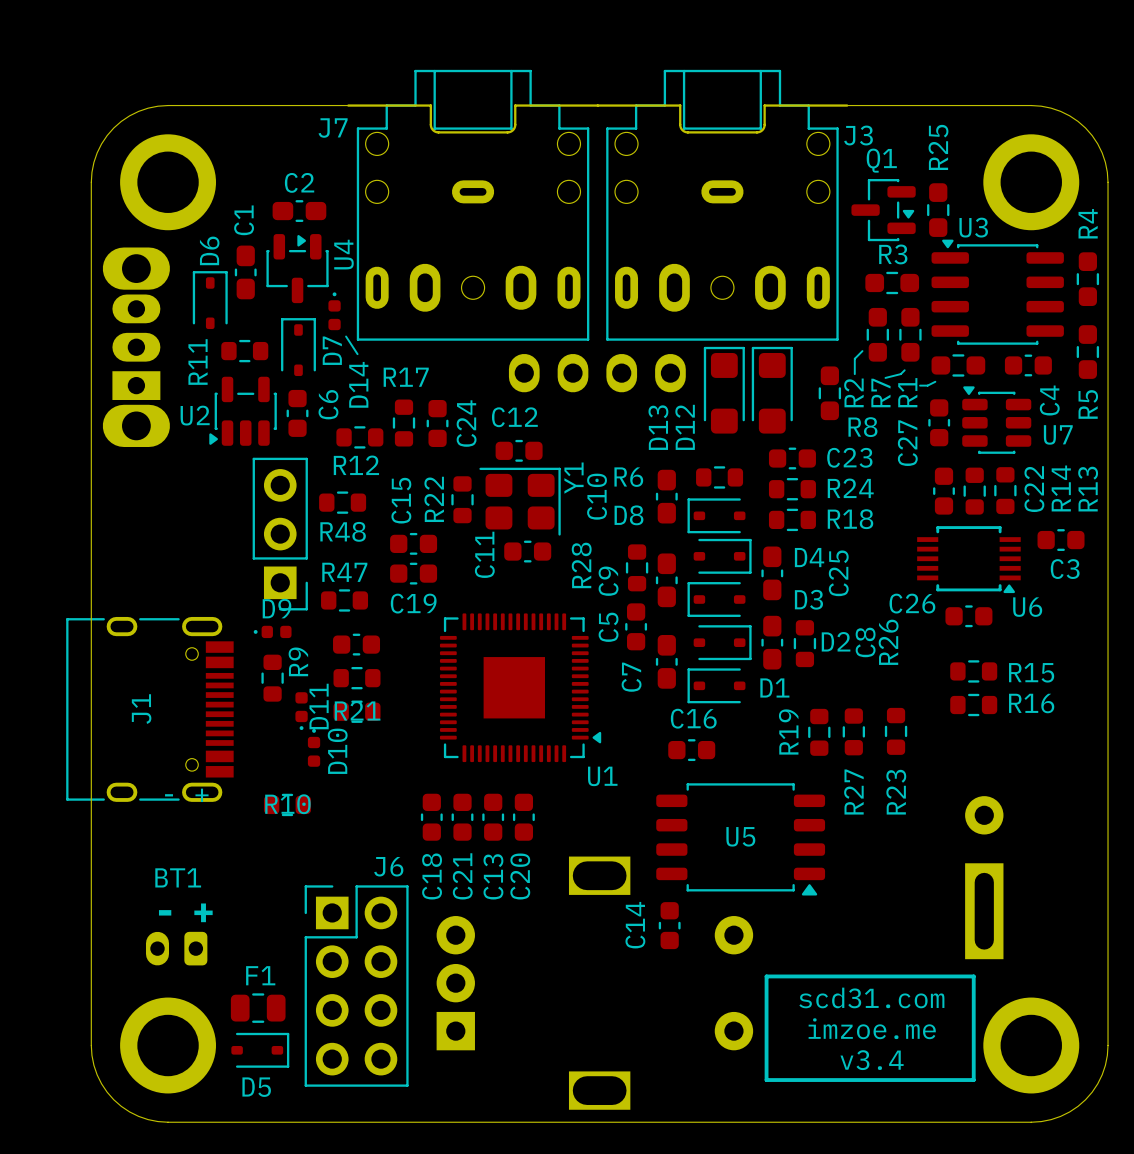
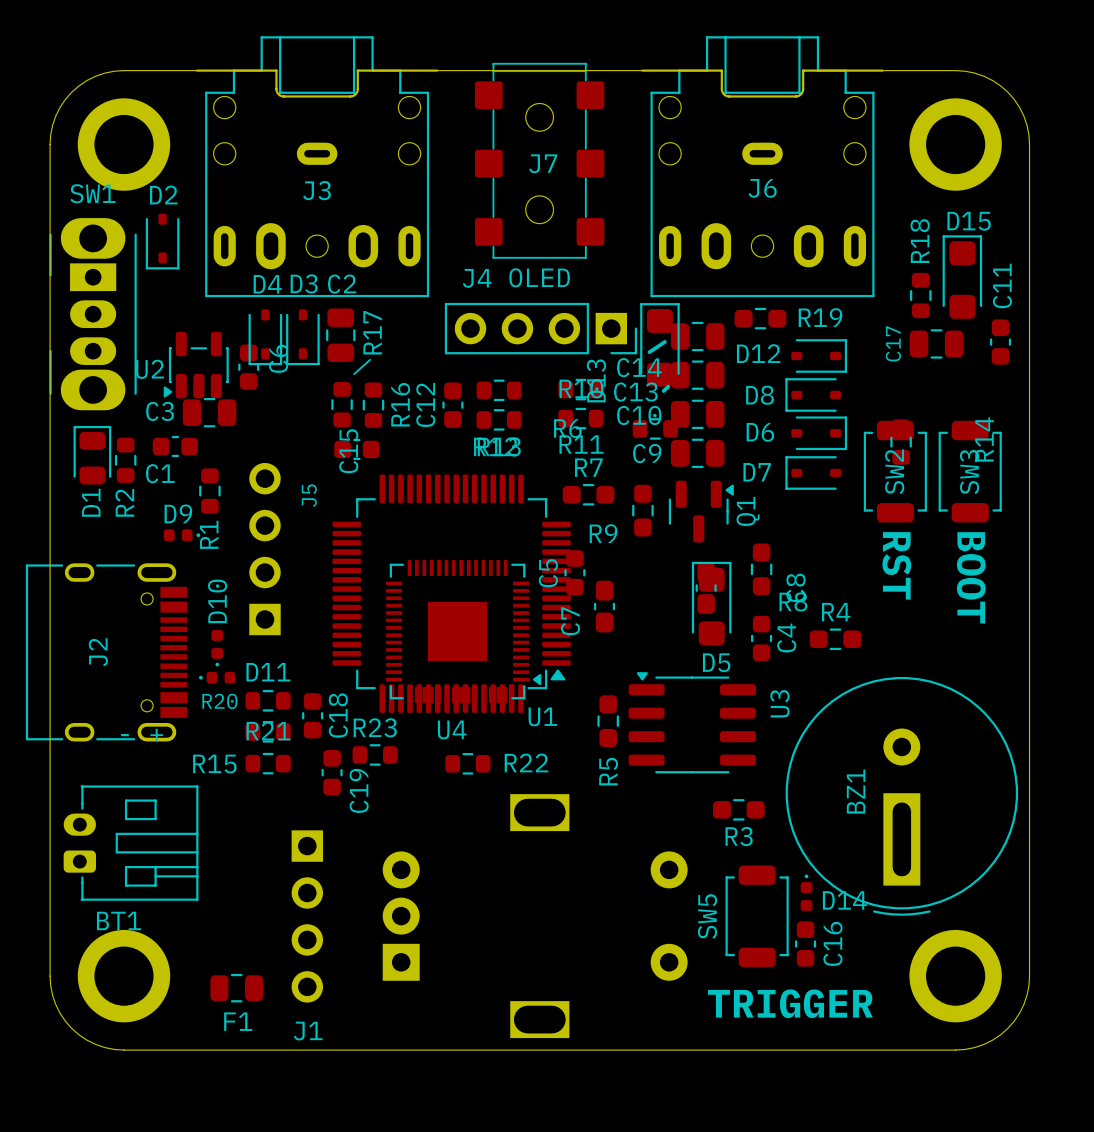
J7 footprint: [347, 69, 599, 341] -> [474, 62, 605, 259]
board edge: (243, 105) (348, 105) -> none
board edge: none -> (437, 70) (642, 70)
board edge: (847, 105) (955, 105) -> none
J7 name position: J7 (333, 128) -> J7 (543, 163)
J3 name position: J3 (858, 135) -> J3 (317, 190)
Q1 name position: Q1 (881, 160) -> Q1 (748, 511)
Q1 footprint: [851, 179, 916, 242] -> [668, 480, 734, 543]
C2 footprint: [272, 200, 327, 222] -> [326, 308, 356, 363]
J3 position: (722, 205) -> (317, 166)
R25: (938, 210) -> none
C1 name position: C1 (244, 220) -> C1 (160, 473)
U3 name position: U3 (973, 227) -> U3 (779, 703)
U4 footprint: [266, 234, 329, 304] -> [332, 474, 571, 713]
U3 footprint: [931, 239, 1064, 345] -> [628, 672, 757, 774]
C1 footprint: [234, 245, 257, 300] -> [152, 435, 199, 458]
D6 name position: D6 (209, 250) -> D6 (760, 432)
U4 name position: U4 (343, 254) -> U4 (452, 729)
R3 name position: R3 (893, 254) -> R3 (739, 836)
R4 rotation: 0° (1087, 279) -> 90° clockwise (835, 639)
R4 position: (1087, 279) -> (835, 639)
R3 position: (892, 282) -> (738, 809)
D6 rotation: 0° (210, 300) -> 90° counterclockwise (813, 472)
D6 position: (210, 300) -> (813, 472)
R2 footprint: [866, 307, 889, 362] -> [114, 437, 137, 483]
D14 position: (334, 311) -> (806, 892)
D15: none -> (962, 277)
text: none -> OLED (539, 277)
R7 rotation: 0° (910, 334) -> 90° clockwise (588, 494)
R7 position: (910, 334) -> (588, 494)
line: (346, 336) (357, 354) -> none
D12 footprint: [751, 346, 793, 434] -> [791, 339, 848, 373]
SW1 side: bottom (136, 347) -> top (93, 314)
D7 rotation: 0° (298, 347) -> 90° clockwise (819, 433)
D7 position: (298, 347) -> (819, 433)
D7 name position: D7 (332, 350) -> D7 (757, 472)
R11 position: (244, 351) -> (580, 418)
line: (862, 351) (854, 358) (854, 374) -> none
R5 position: (1087, 352) -> (608, 721)
R1 footprint: [931, 354, 986, 377] -> [199, 468, 221, 514]
R11 name rotation: 0° (198, 362) -> 90° clockwise (581, 444)
C4 rotation: 0° (1028, 365) -> 90° clockwise (761, 638)
C4 position: (1028, 365) -> (761, 638)
line: (904, 370) (900, 374) (885, 377) -> none
part: (597, 373) -> none
J4: none -> (540, 328)
R17 name rotation: 0° (406, 377) -> 90° counterclockwise (372, 332)
line: (935, 381) (927, 385) (920, 385) -> none
D14 name rotation: 0° (358, 384) -> 90° clockwise (844, 900)
line: none -> (664, 341) (649, 352)
C17: none -> (936, 343)
R1 name position: R1 (907, 392) -> R1 (209, 534)
R8 position: (829, 393) -> (761, 569)
R7 name position: R7 (880, 393) -> R7 (588, 467)
line: none -> (370, 359) (354, 374)
C12 name position: C12 (514, 417) -> C12 (425, 405)
U7: (996, 420) -> none
C27: (939, 422) -> none
R17 position: (404, 423) -> (342, 404)
C24: (437, 423) -> none
D12 name position: D12 (685, 427) -> D12 (758, 353)
line: none -> (668, 386) (663, 391)
R12 position: (359, 437) -> (499, 419)
C12 rotation: 0° (519, 450) -> 90° clockwise (452, 405)
C23: (792, 458) -> none
C10 footprint: [655, 469, 678, 524] -> [670, 399, 725, 430]
R24: (792, 489) -> none
R13 rotation: 0° (1005, 490) -> 90° clockwise (499, 390)
R13 position: (1005, 490) -> (499, 390)
C22: (944, 491) -> none
R22 name position: R22 (434, 499) -> R22 (526, 762)
R22 rotation: 0° (462, 499) -> 90° clockwise (467, 763)
R22 position: (462, 499) -> (467, 763)
Y1: (520, 501) -> none
R48: (342, 502) -> none
D8 name position: D8 (628, 515) -> D8 (760, 395)
D8 position: (716, 515) -> (813, 394)
R18 rotation: 0° (792, 519) -> 90° clockwise (920, 295)
R18 position: (792, 519) -> (920, 295)
R18 name position: R18 (850, 519) -> R18 (920, 241)
SW2: none -> (895, 471)
SW3: none -> (970, 471)
C3 footprint: [1037, 529, 1085, 551] -> [182, 397, 237, 428]
part: (280, 534) -> none
C15 position: (413, 543) -> (356, 449)
C11 rotation: 0° (527, 551) -> 90° clockwise (1000, 342)
C11 position: (527, 551) -> (1000, 342)
C9 footprint: [655, 553, 678, 608] -> [670, 438, 725, 469]
D4 rotation: 0° (722, 556) -> 90° clockwise (265, 337)
D4 position: (722, 556) -> (265, 337)
D4 name position: D4 (809, 557) -> D4 (267, 284)
U6: (968, 559) -> none
R28: (637, 567) -> none
C3 name position: C3 (1065, 569) -> C3 (160, 411)
C19 rotation: 0° (413, 573) -> 90° clockwise (332, 772)
C19 position: (413, 573) -> (332, 772)
C25: (772, 573) -> none
D3 rotation: 0° (716, 599) -> 90° counterclockwise (302, 337)
D3 position: (716, 599) -> (302, 337)
R47: (344, 600) -> none
J5: none -> (265, 549)
C26: (968, 616) -> none
text: none -> RST (896, 565)
D9 rotation: 0° (272, 631) -> 180° (181, 535)
D9 position: (272, 631) -> (181, 535)
text: none -> BOOT (971, 577)
D2 name position: D2 (836, 641) -> D2 (163, 195)
D2 rotation: 0° (722, 642) -> 90° clockwise (162, 241)
D2 position: (722, 642) -> (162, 241)
R26: (804, 643) -> none
part: (356, 644) -> none
R9 footprint: [261, 654, 284, 702] -> [632, 484, 654, 537]
R9 name position: R9 (298, 661) -> R9 (603, 533)
D1 footprint: [687, 668, 746, 704] -> [73, 425, 112, 485]
R15 position: (973, 671) -> (268, 763)
R15 name position: R15 (1031, 672) -> R15 (214, 764)
part: (357, 678) -> none
D1 name position: D1 (774, 687) -> D1 (91, 502)
R16 rotation: 0° (973, 705) -> 90° clockwise (373, 405)
R16 position: (973, 705) -> (373, 405)
R19 footprint: [808, 708, 831, 756] -> [734, 307, 787, 330]
J1 name: J1 (141, 709) -> J2 (98, 652)
D11 rotation: 0° (301, 711) -> 90° clockwise (217, 677)
D11 position: (301, 711) -> (217, 677)
R21 position: (357, 711) -> (268, 731)
R19 name position: R19 (788, 731) -> R19 (820, 317)
R27: (853, 731) -> none
R23 rotation: 0° (896, 731) -> 90° clockwise (375, 754)
R23 position: (896, 731) -> (375, 754)
D10 rotation: 0° (314, 747) -> 180° (217, 648)
D10 position: (314, 747) -> (217, 648)
C16 rotation: 0° (691, 750) -> 90° clockwise (805, 944)
C16 position: (691, 750) -> (805, 944)
D10 name position: D10 (337, 751) -> D10 (217, 601)
R20: none -> (268, 700)
R23 name position: R23 (896, 792) -> R23 (375, 727)
C13 footprint: [482, 793, 505, 841] -> [670, 360, 725, 390]
R10 position: (287, 804) -> (581, 389)
C18 position: (431, 817) -> (312, 715)
C21: (462, 817) -> none
C20: (523, 817) -> none
U5: (740, 839) -> none
J6 name position: J6 (388, 866) -> J6 (762, 188)
C18 name position: C18 (432, 876) -> C18 (338, 715)
C13 name position: C13 (493, 876) -> C13 (635, 392)
BT1 name position: BT1 (178, 877) -> BT1 (118, 920)
BZ1 side: bottom (984, 877) -> top (901, 796)
J6 footprint: [304, 885, 409, 1087] -> [641, 36, 884, 298]
C14 footprint: [658, 902, 681, 950] -> [670, 321, 725, 352]
C14 name position: C14 (635, 925) -> C14 (639, 367)
BT1 footprint: [145, 931, 208, 966] -> [63, 785, 199, 901]
F1 name position: F1 (260, 975) -> F1 (238, 1021)
line: (766, 976) (973, 976) (973, 1080) (766, 1080) (766, 976) -> none
J1: none -> (307, 916)
SW5: none -> (757, 916)
text: scd31.com (871, 997) -> none
F1 position: (258, 1008) -> (236, 988)
text: imzoe.me (872, 1028) -> none
D5 footprint: [231, 1032, 290, 1068] -> [691, 561, 732, 646]
text: v3.4 (872, 1060) -> none
text: none -> TRIGGER (790, 1003)

